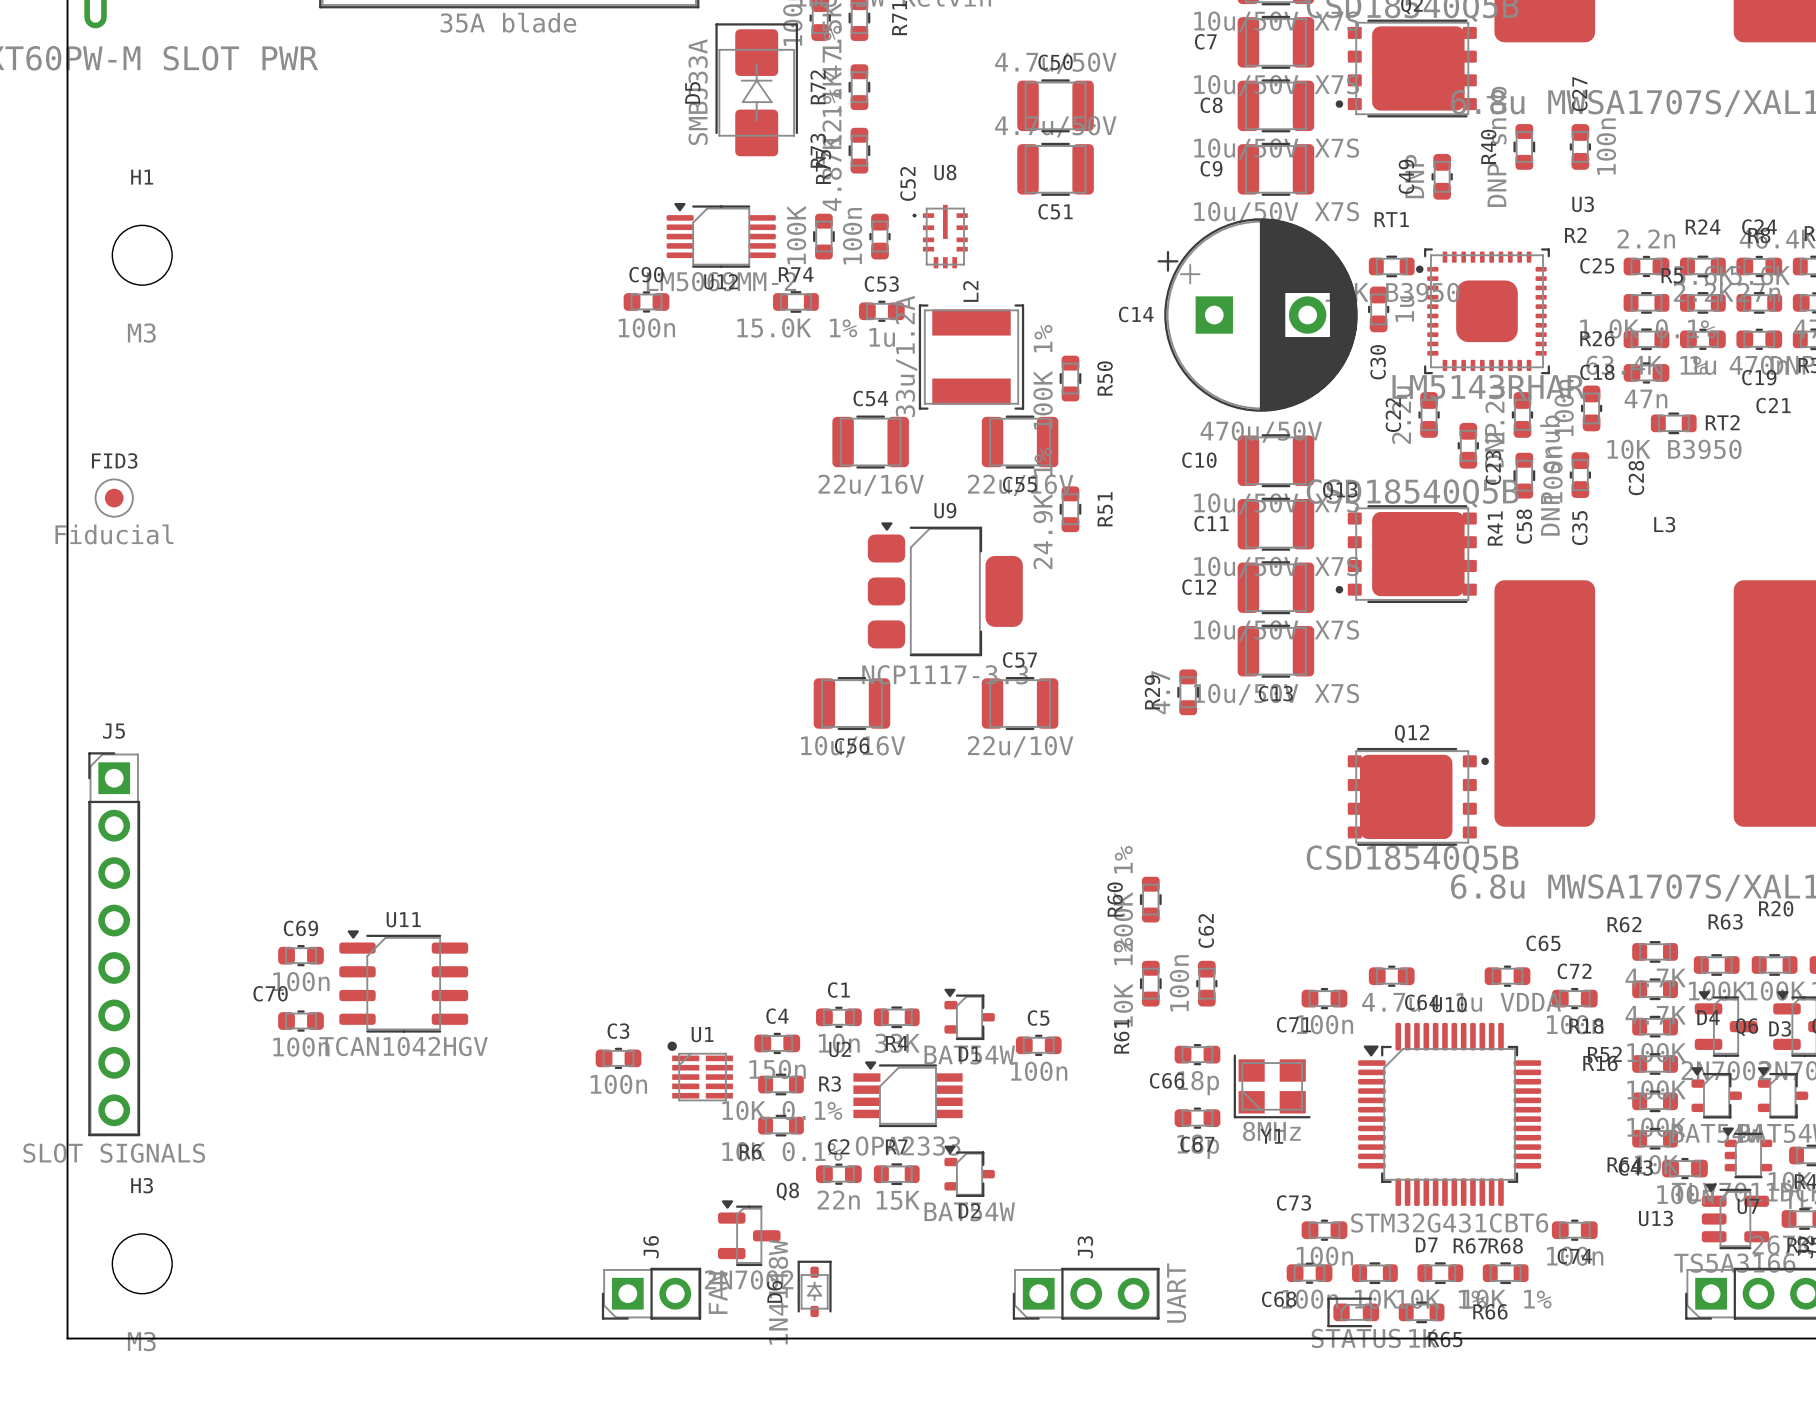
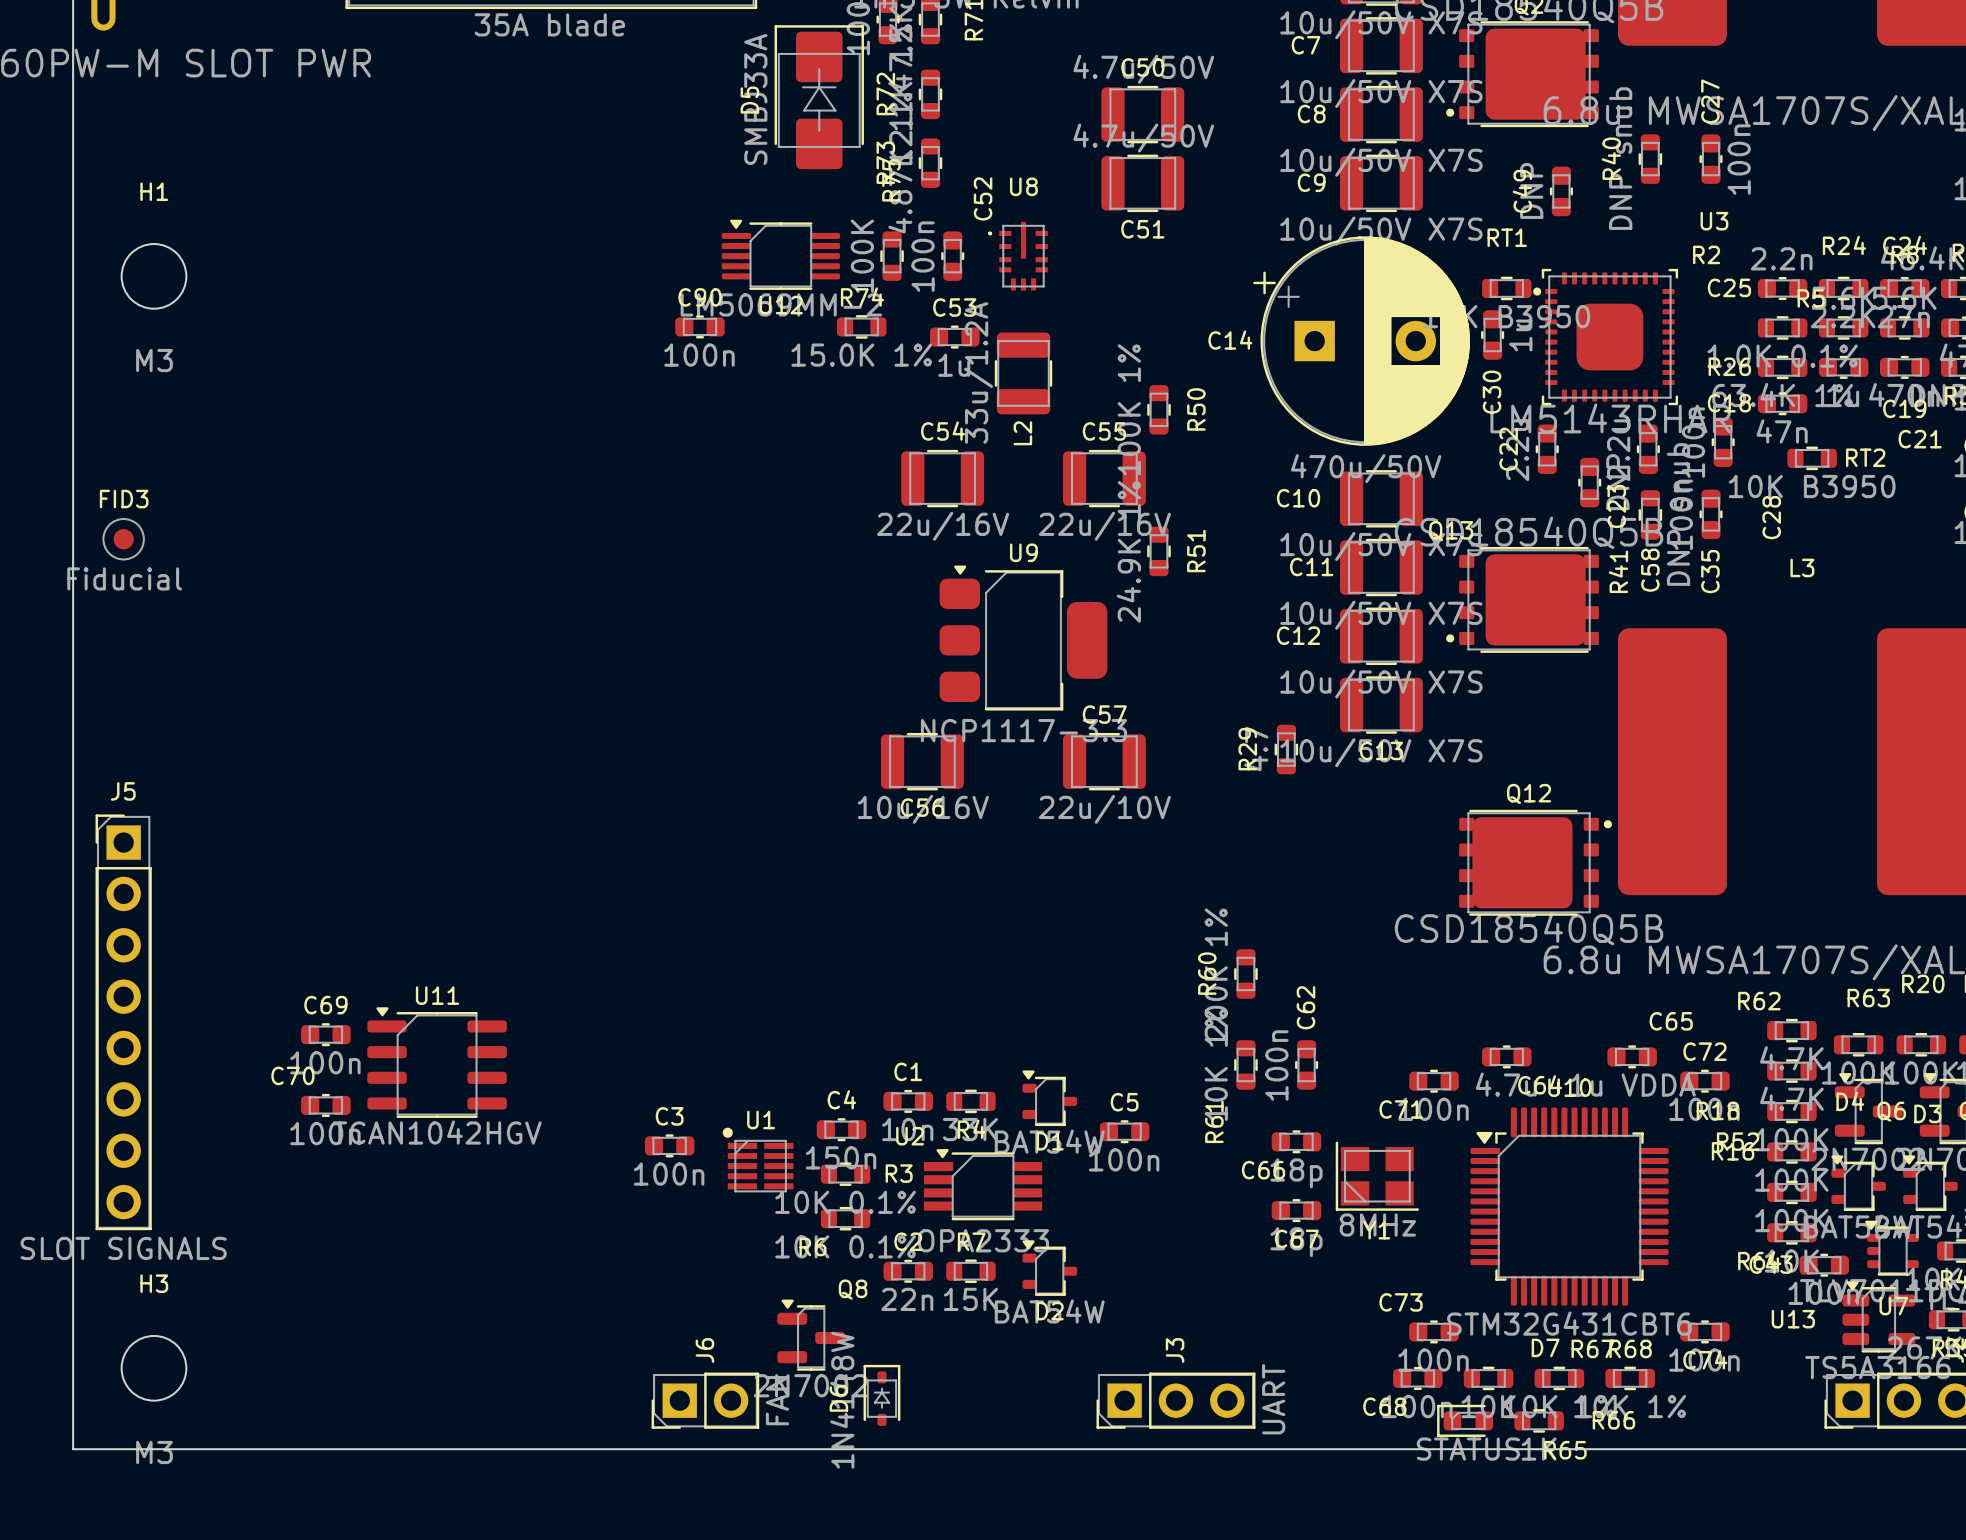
L2 name position: L2 (970, 291) -> L2 (1022, 433)
L2 footprint: [918, 304, 1025, 410] -> [994, 332, 1053, 415]
C55 name position: C55 (1019, 484) -> C55 (1104, 431)

